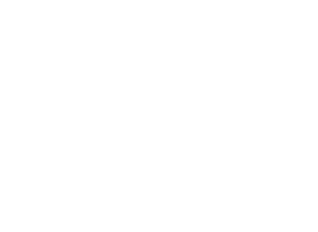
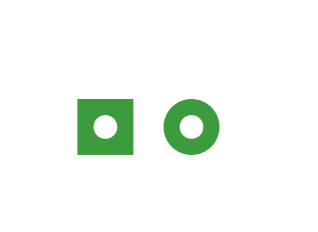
part: none -> (148, 126)

